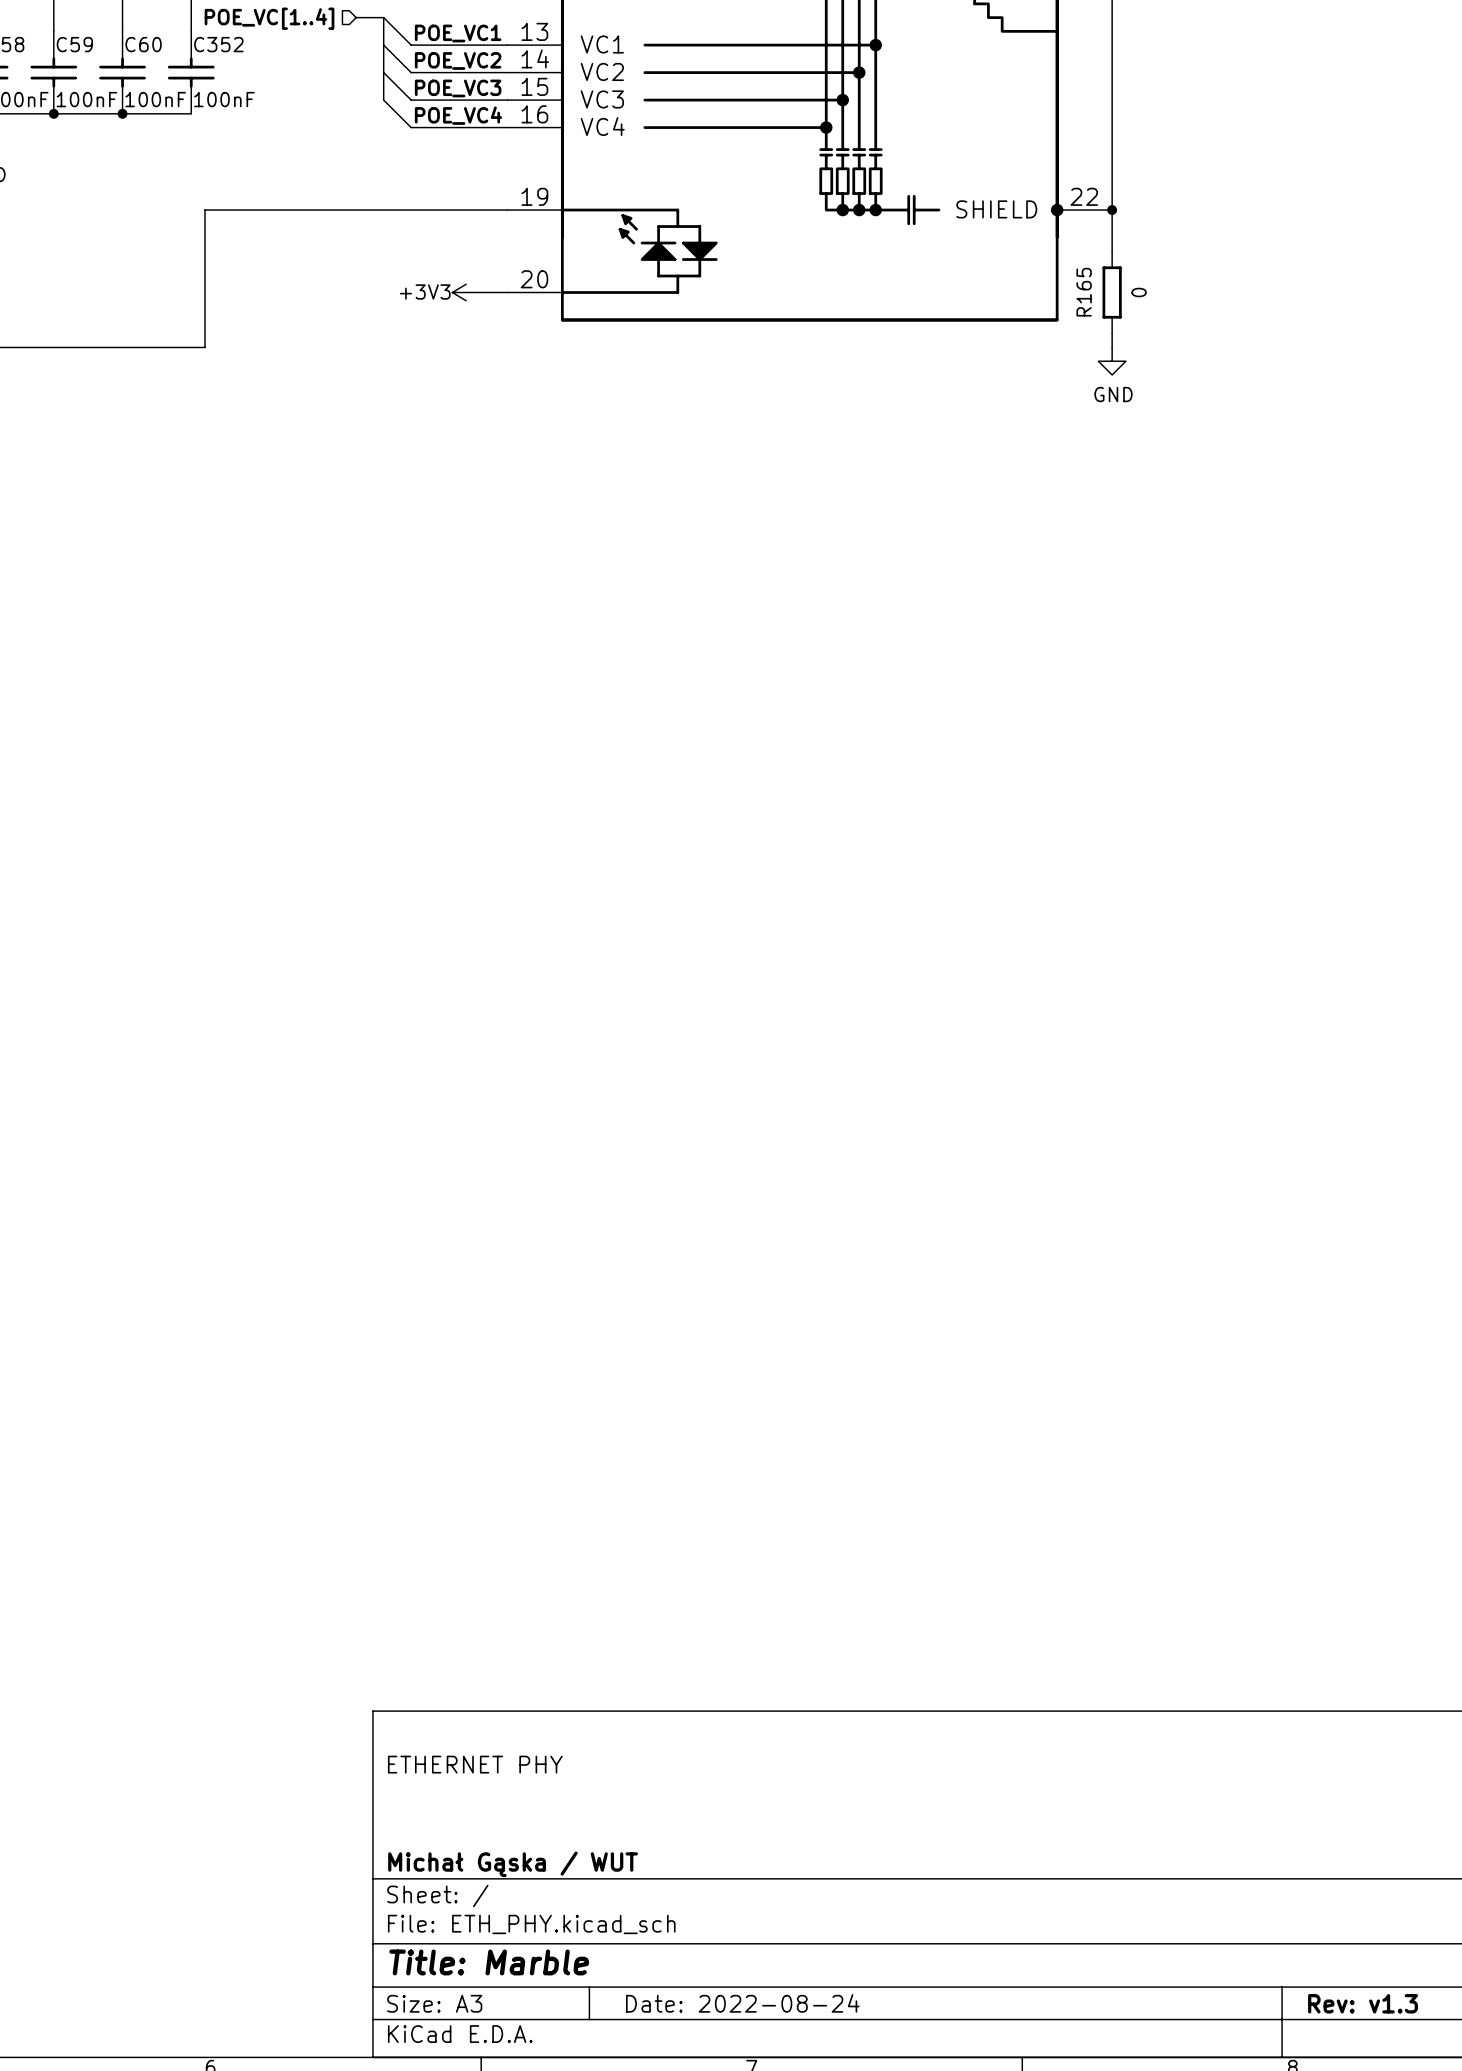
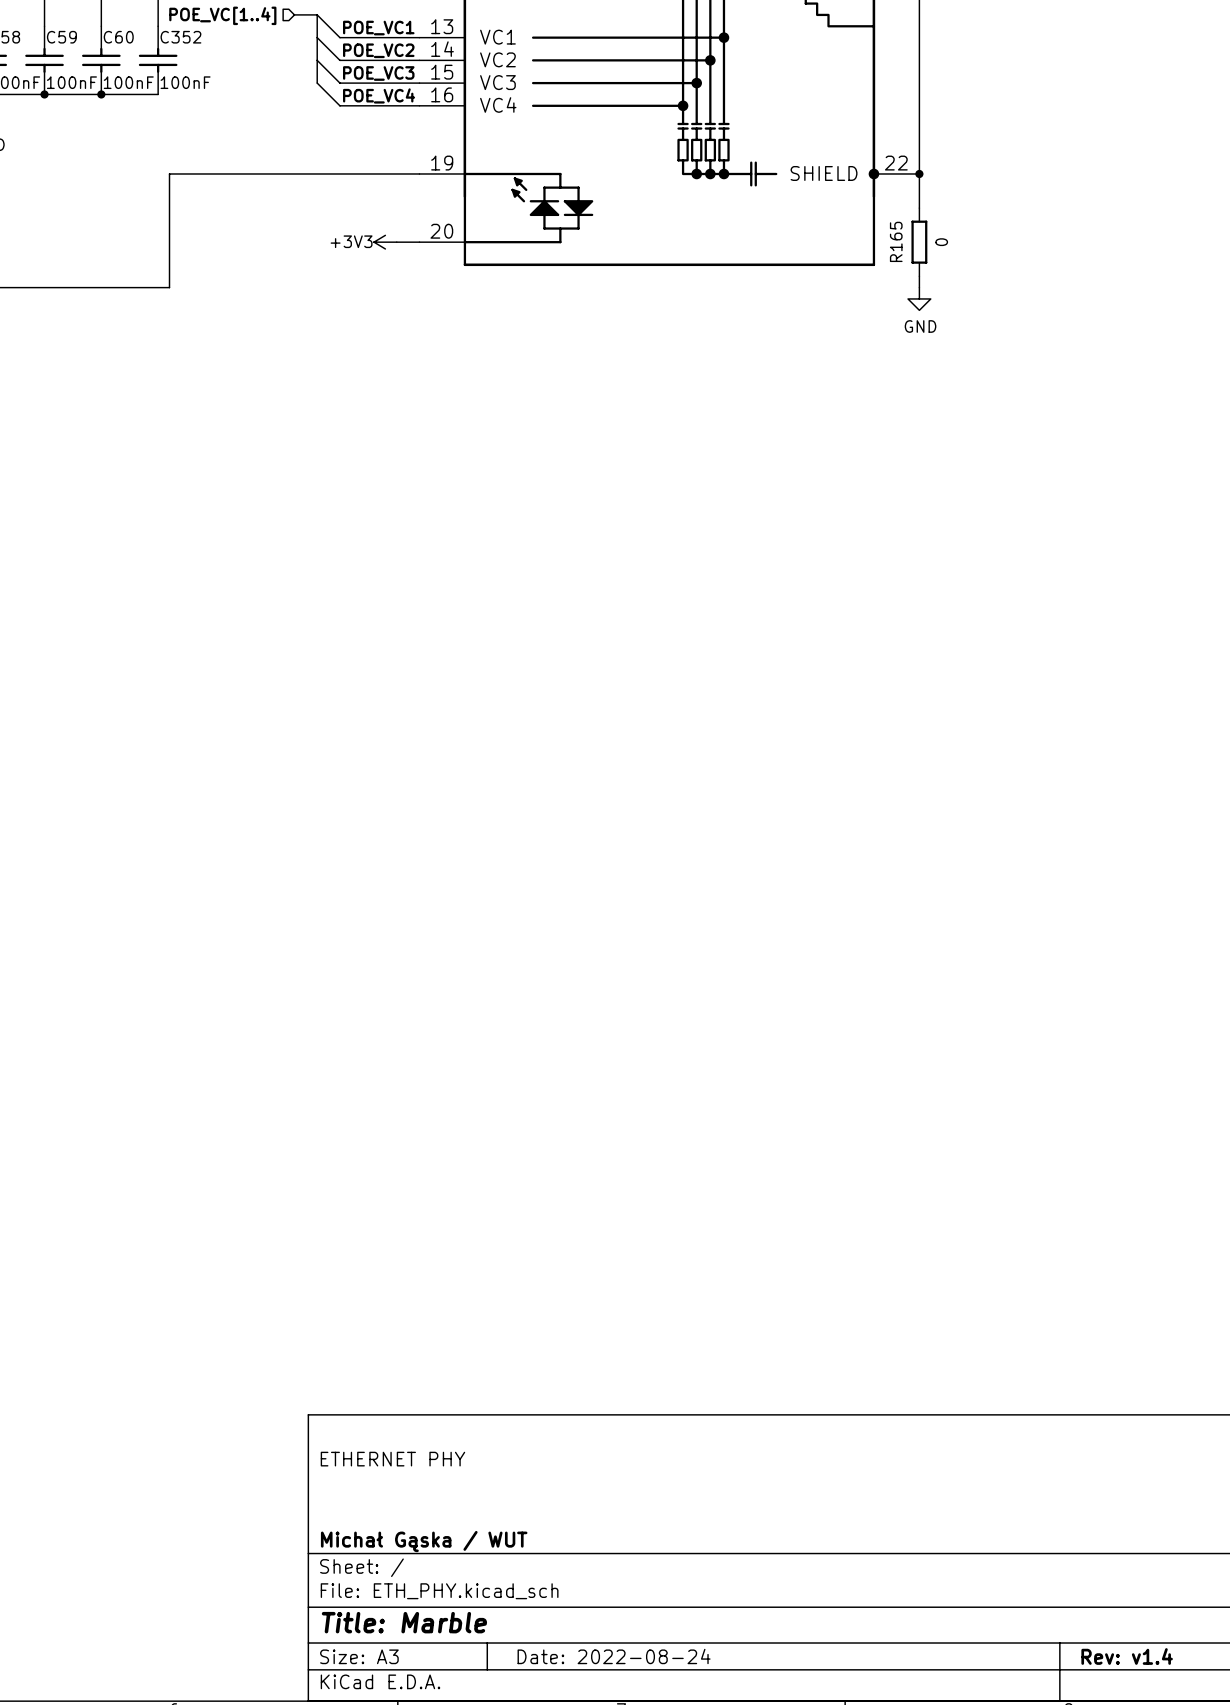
title block: Rev: v1.3 (1363, 2003) -> Rev: v1.4 (1127, 1656)

